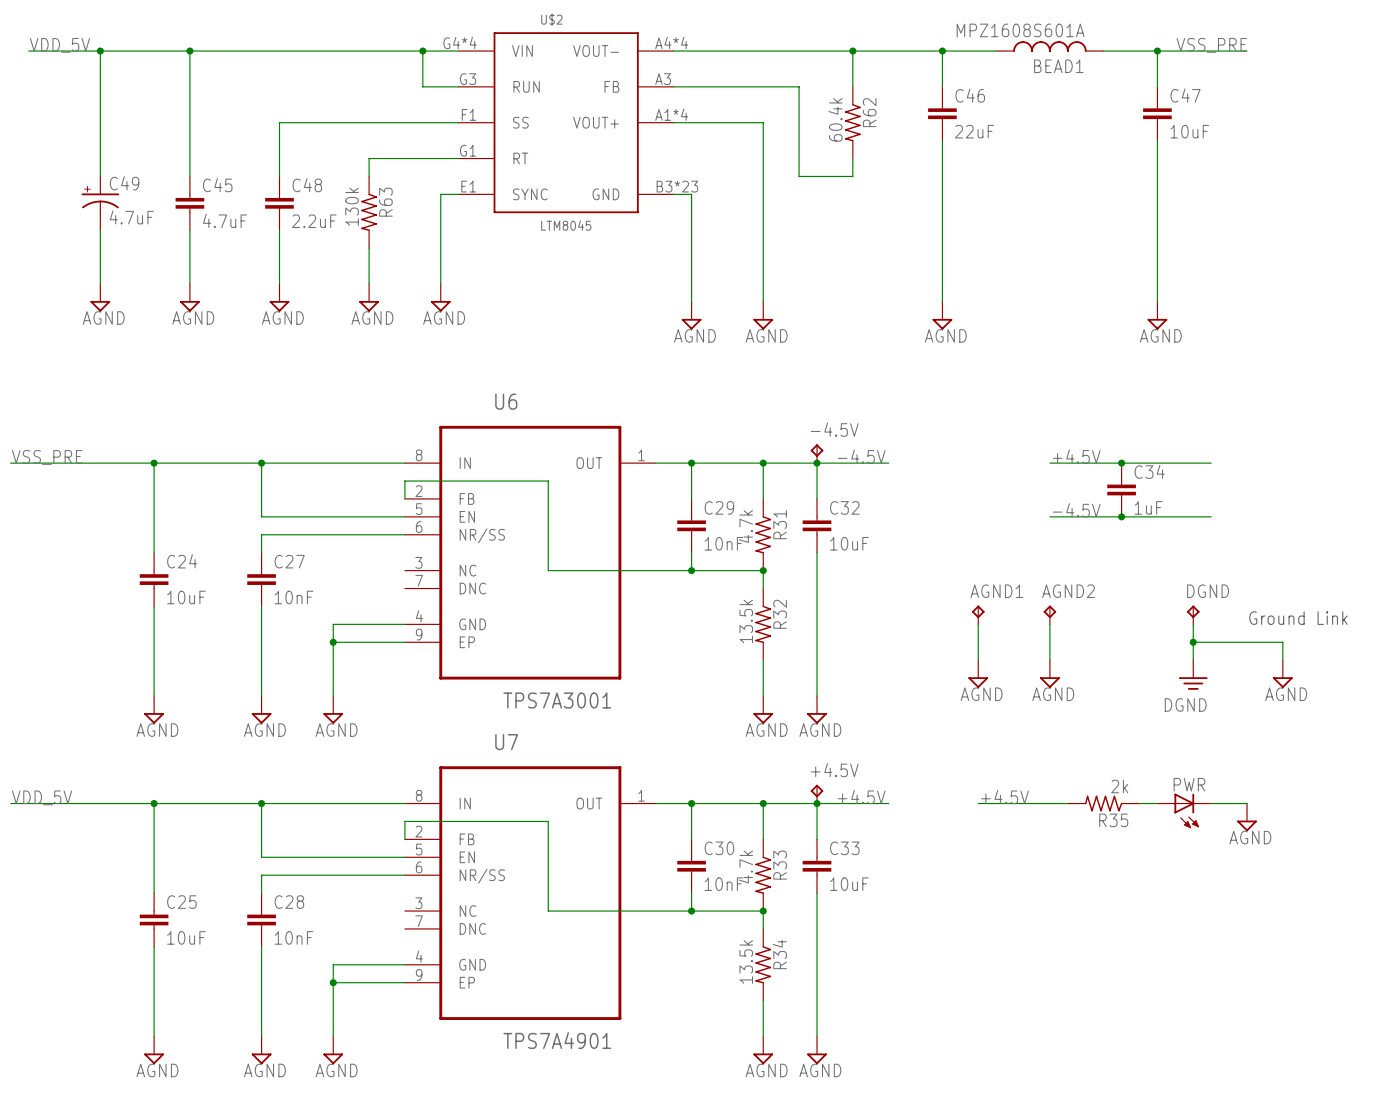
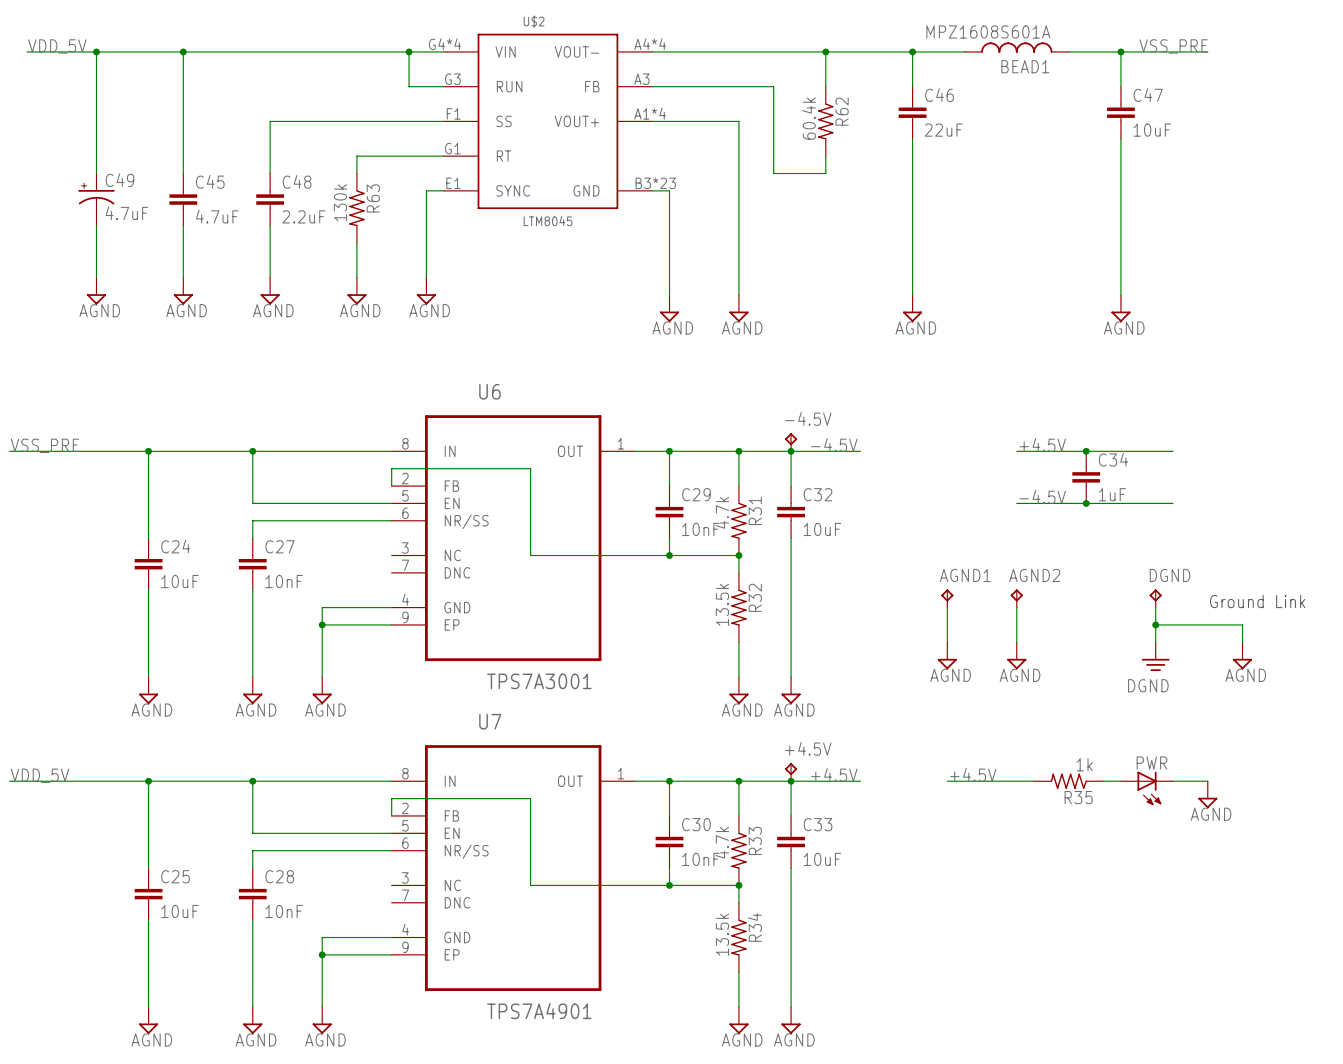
R35 value: 2k (1119, 786) -> 1k (1084, 764)

